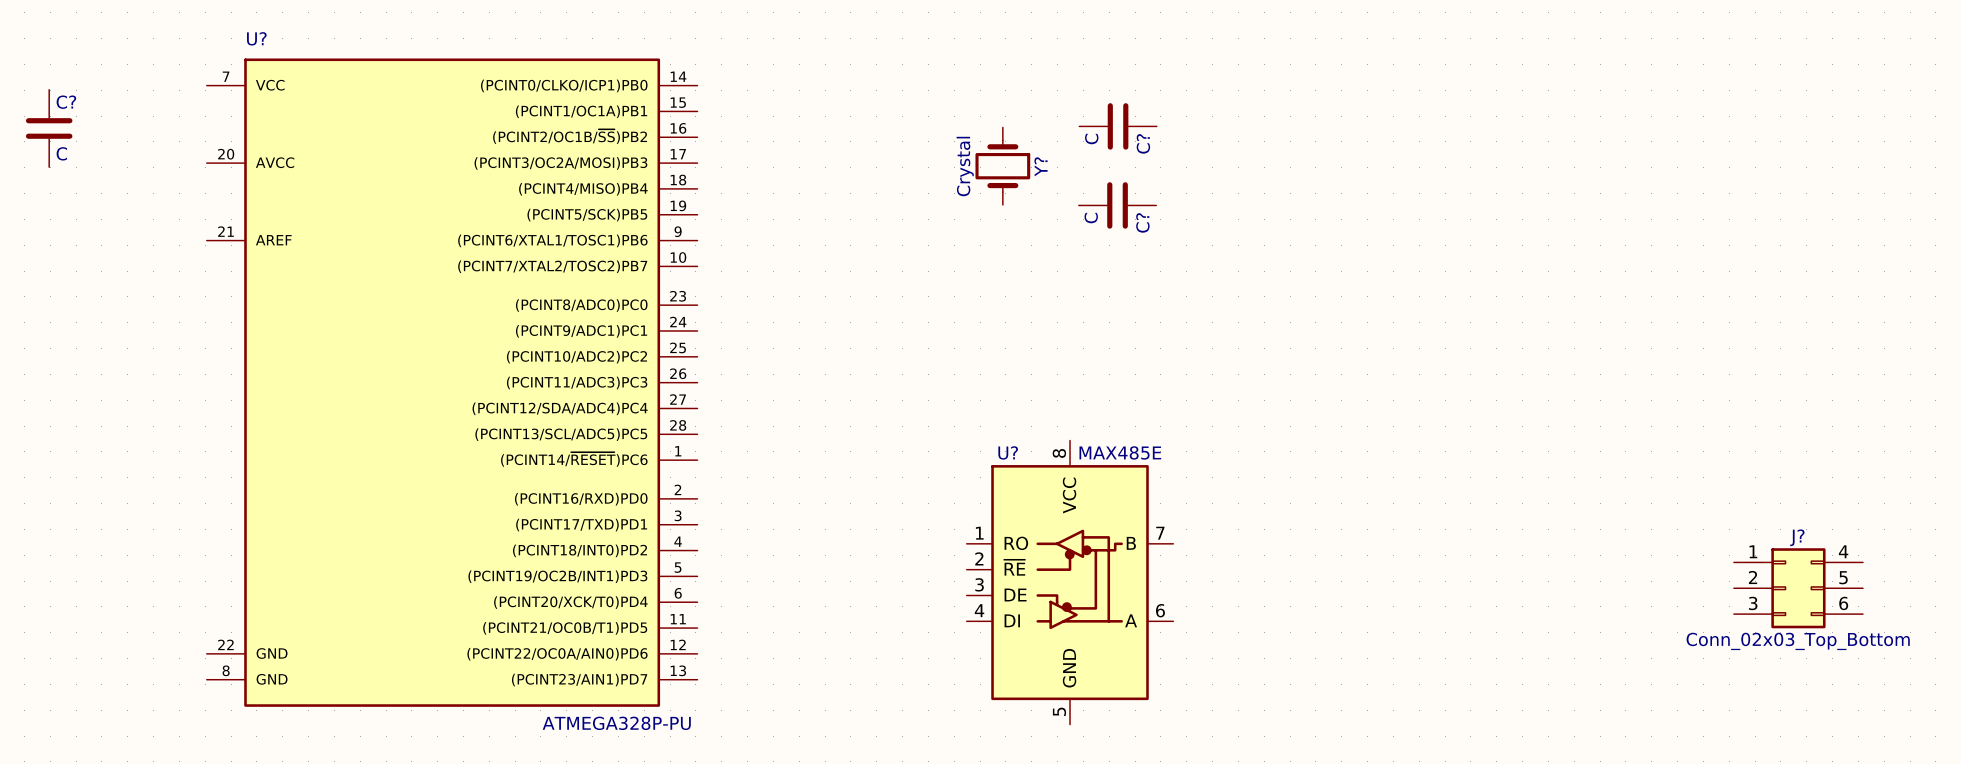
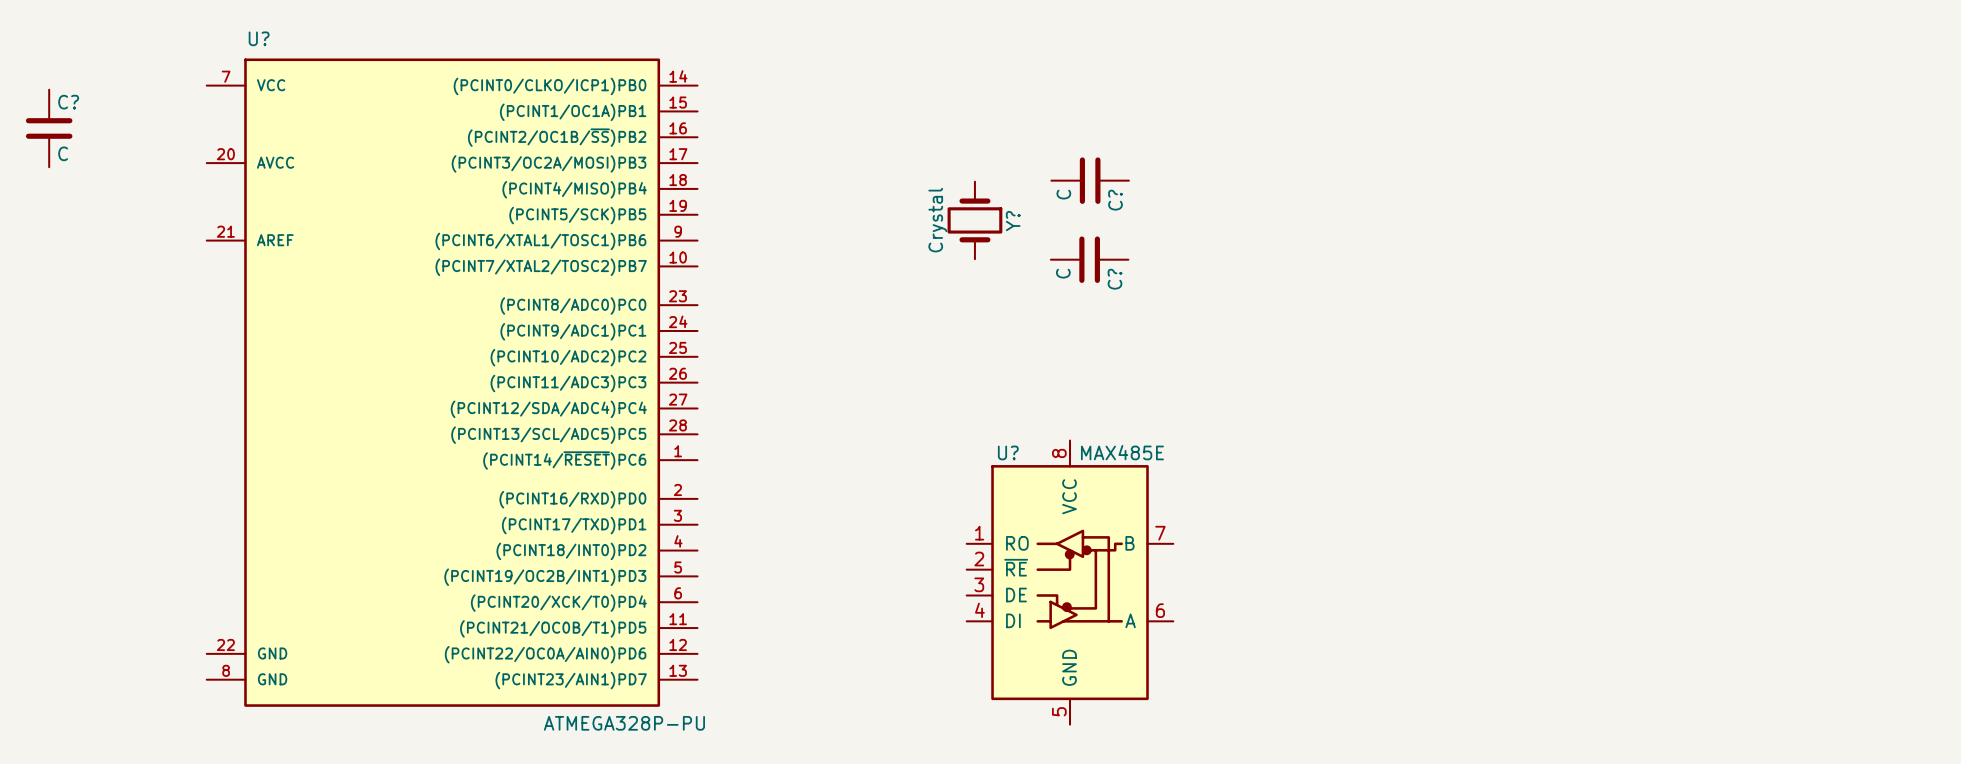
C?: C (1118, 126) -> none
Y? position: (1002, 166) -> (974, 220)
C?: none -> C (1090, 180)
C?: C (1117, 205) -> none
C?: none -> C (1089, 259)
J?: Conn_02x03_Top_Bottom (1798, 588) -> none

